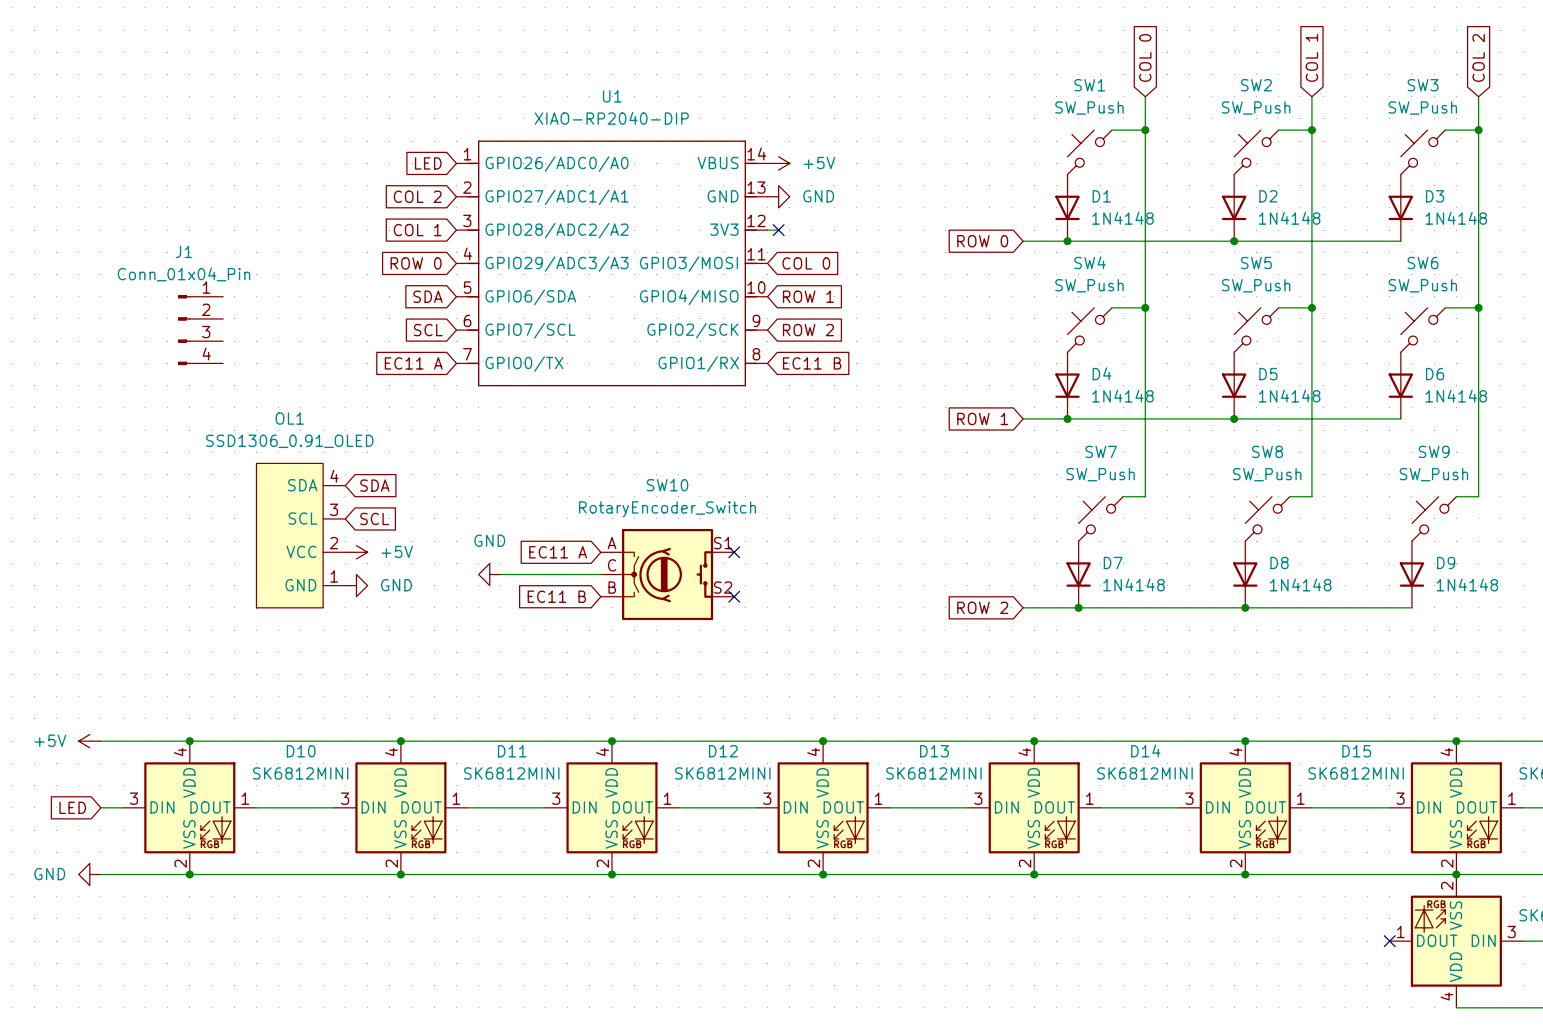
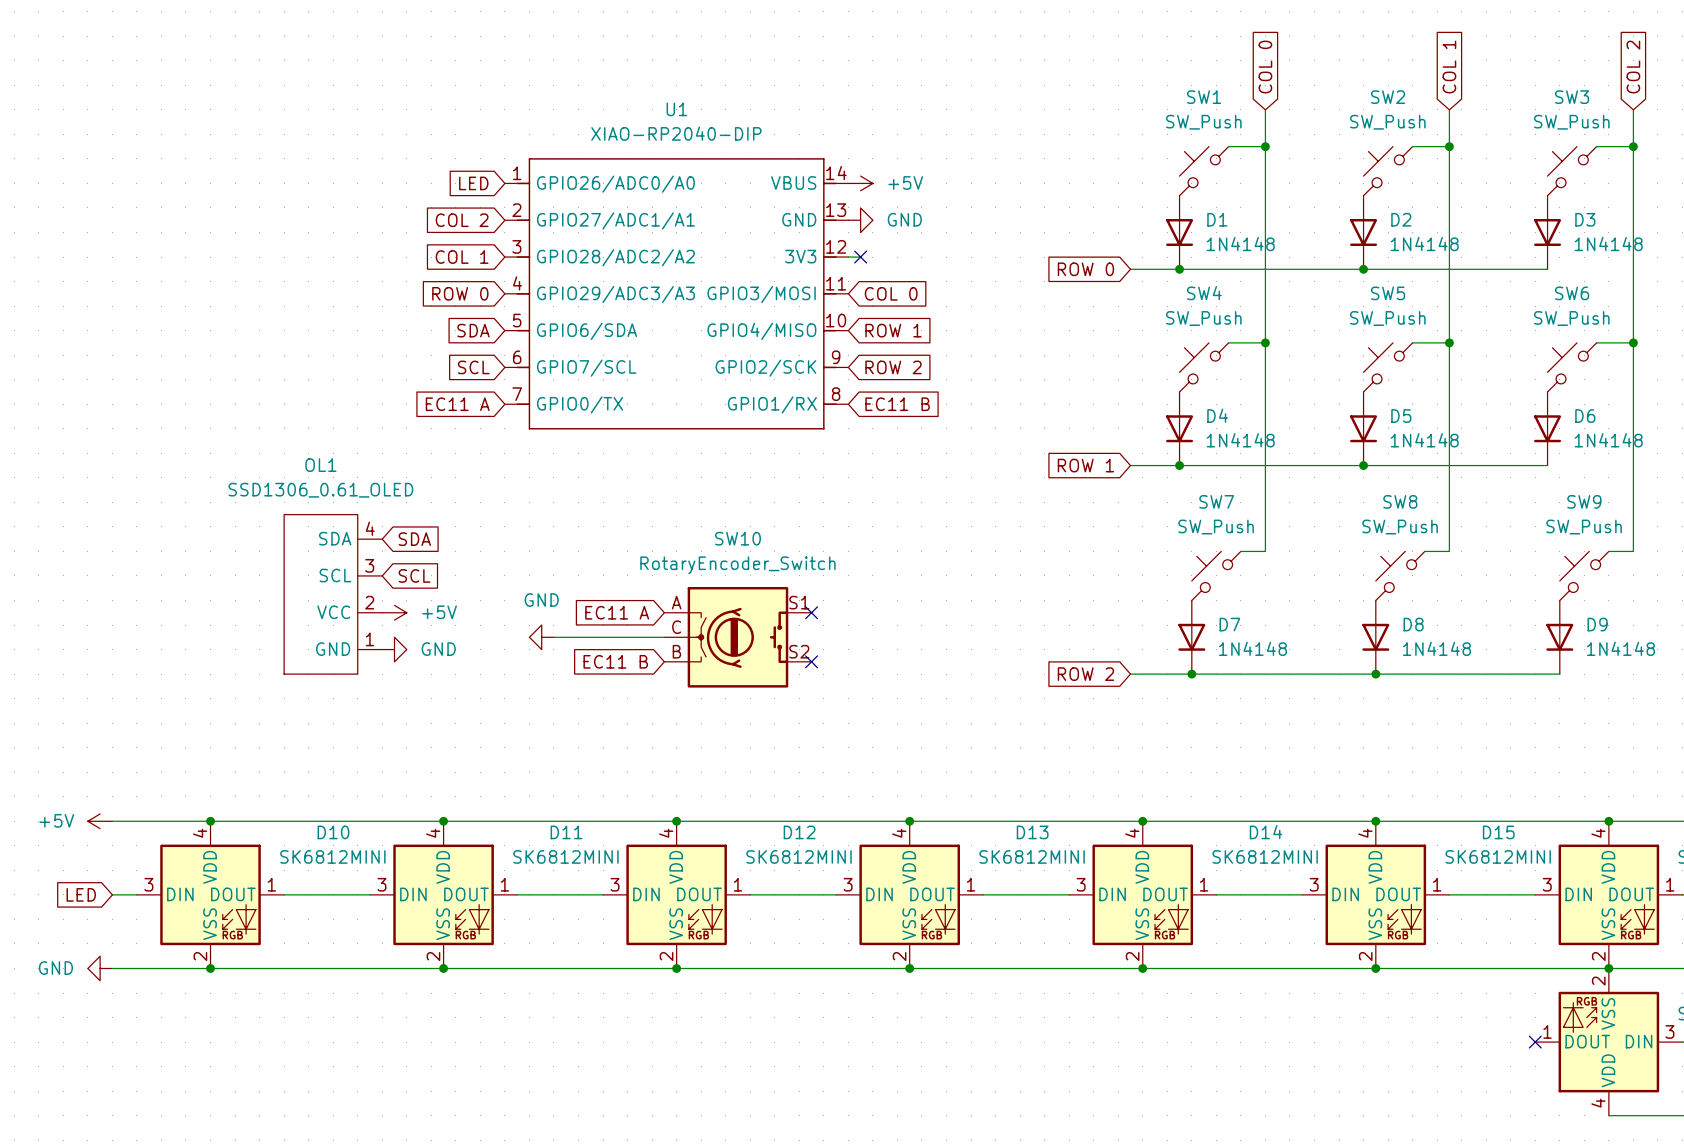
J1: Conn_01x04_Pin (200, 330) -> none
OL1 value: SSD1306_0.91_OLED (289, 441) -> SSD1306_0.61_OLED (320, 490)
OL1 symbol: [256, 463, 346, 608] -> [284, 514, 383, 675]

